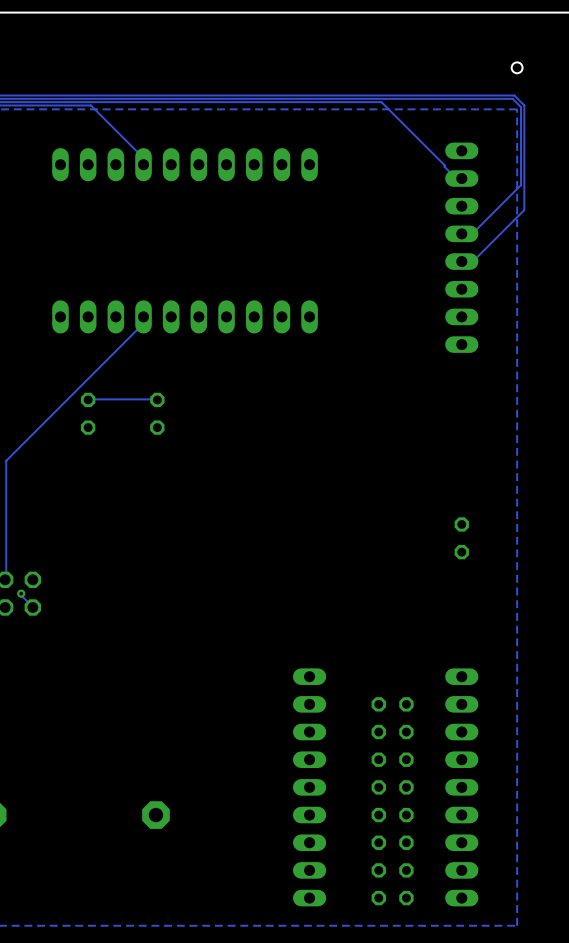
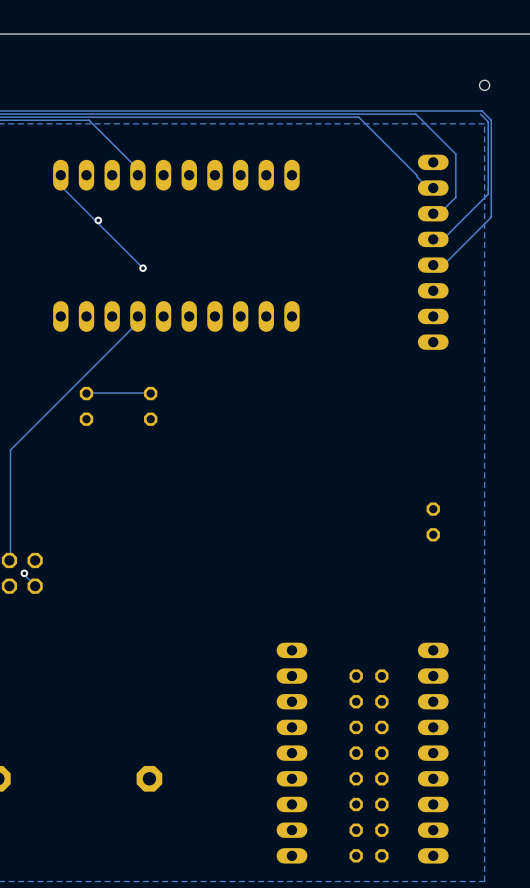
track: (512, 98) (442, 98) -> (433, 213) (440, 212) (455, 197) (455, 154) (415, 114)
track: none -> (60, 175) (61, 186) (143, 268)
via: none -> (98, 220)
via: none -> (143, 268)

